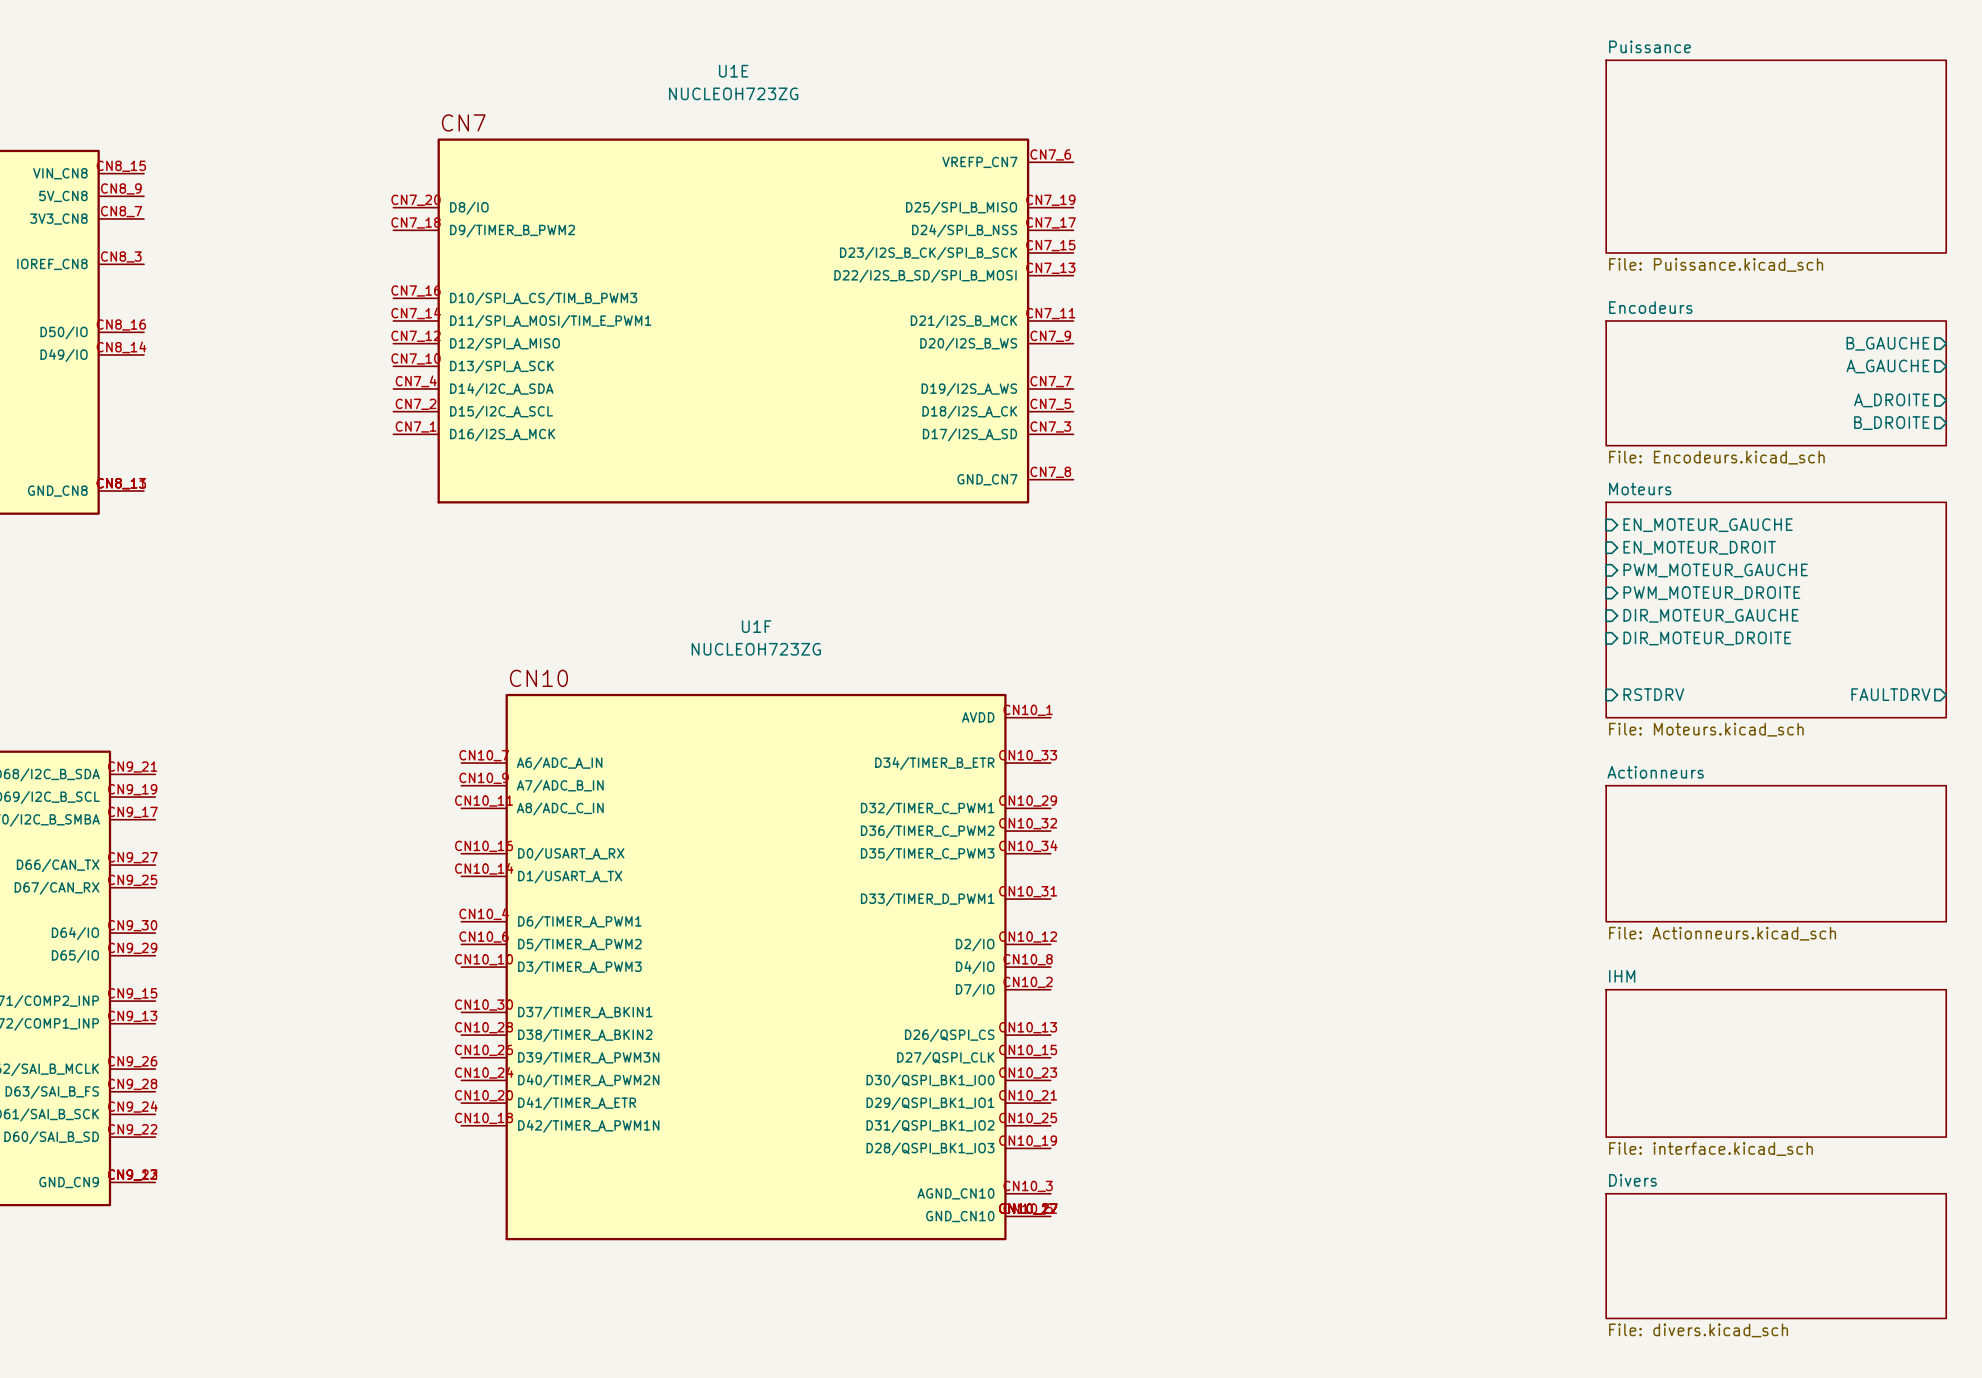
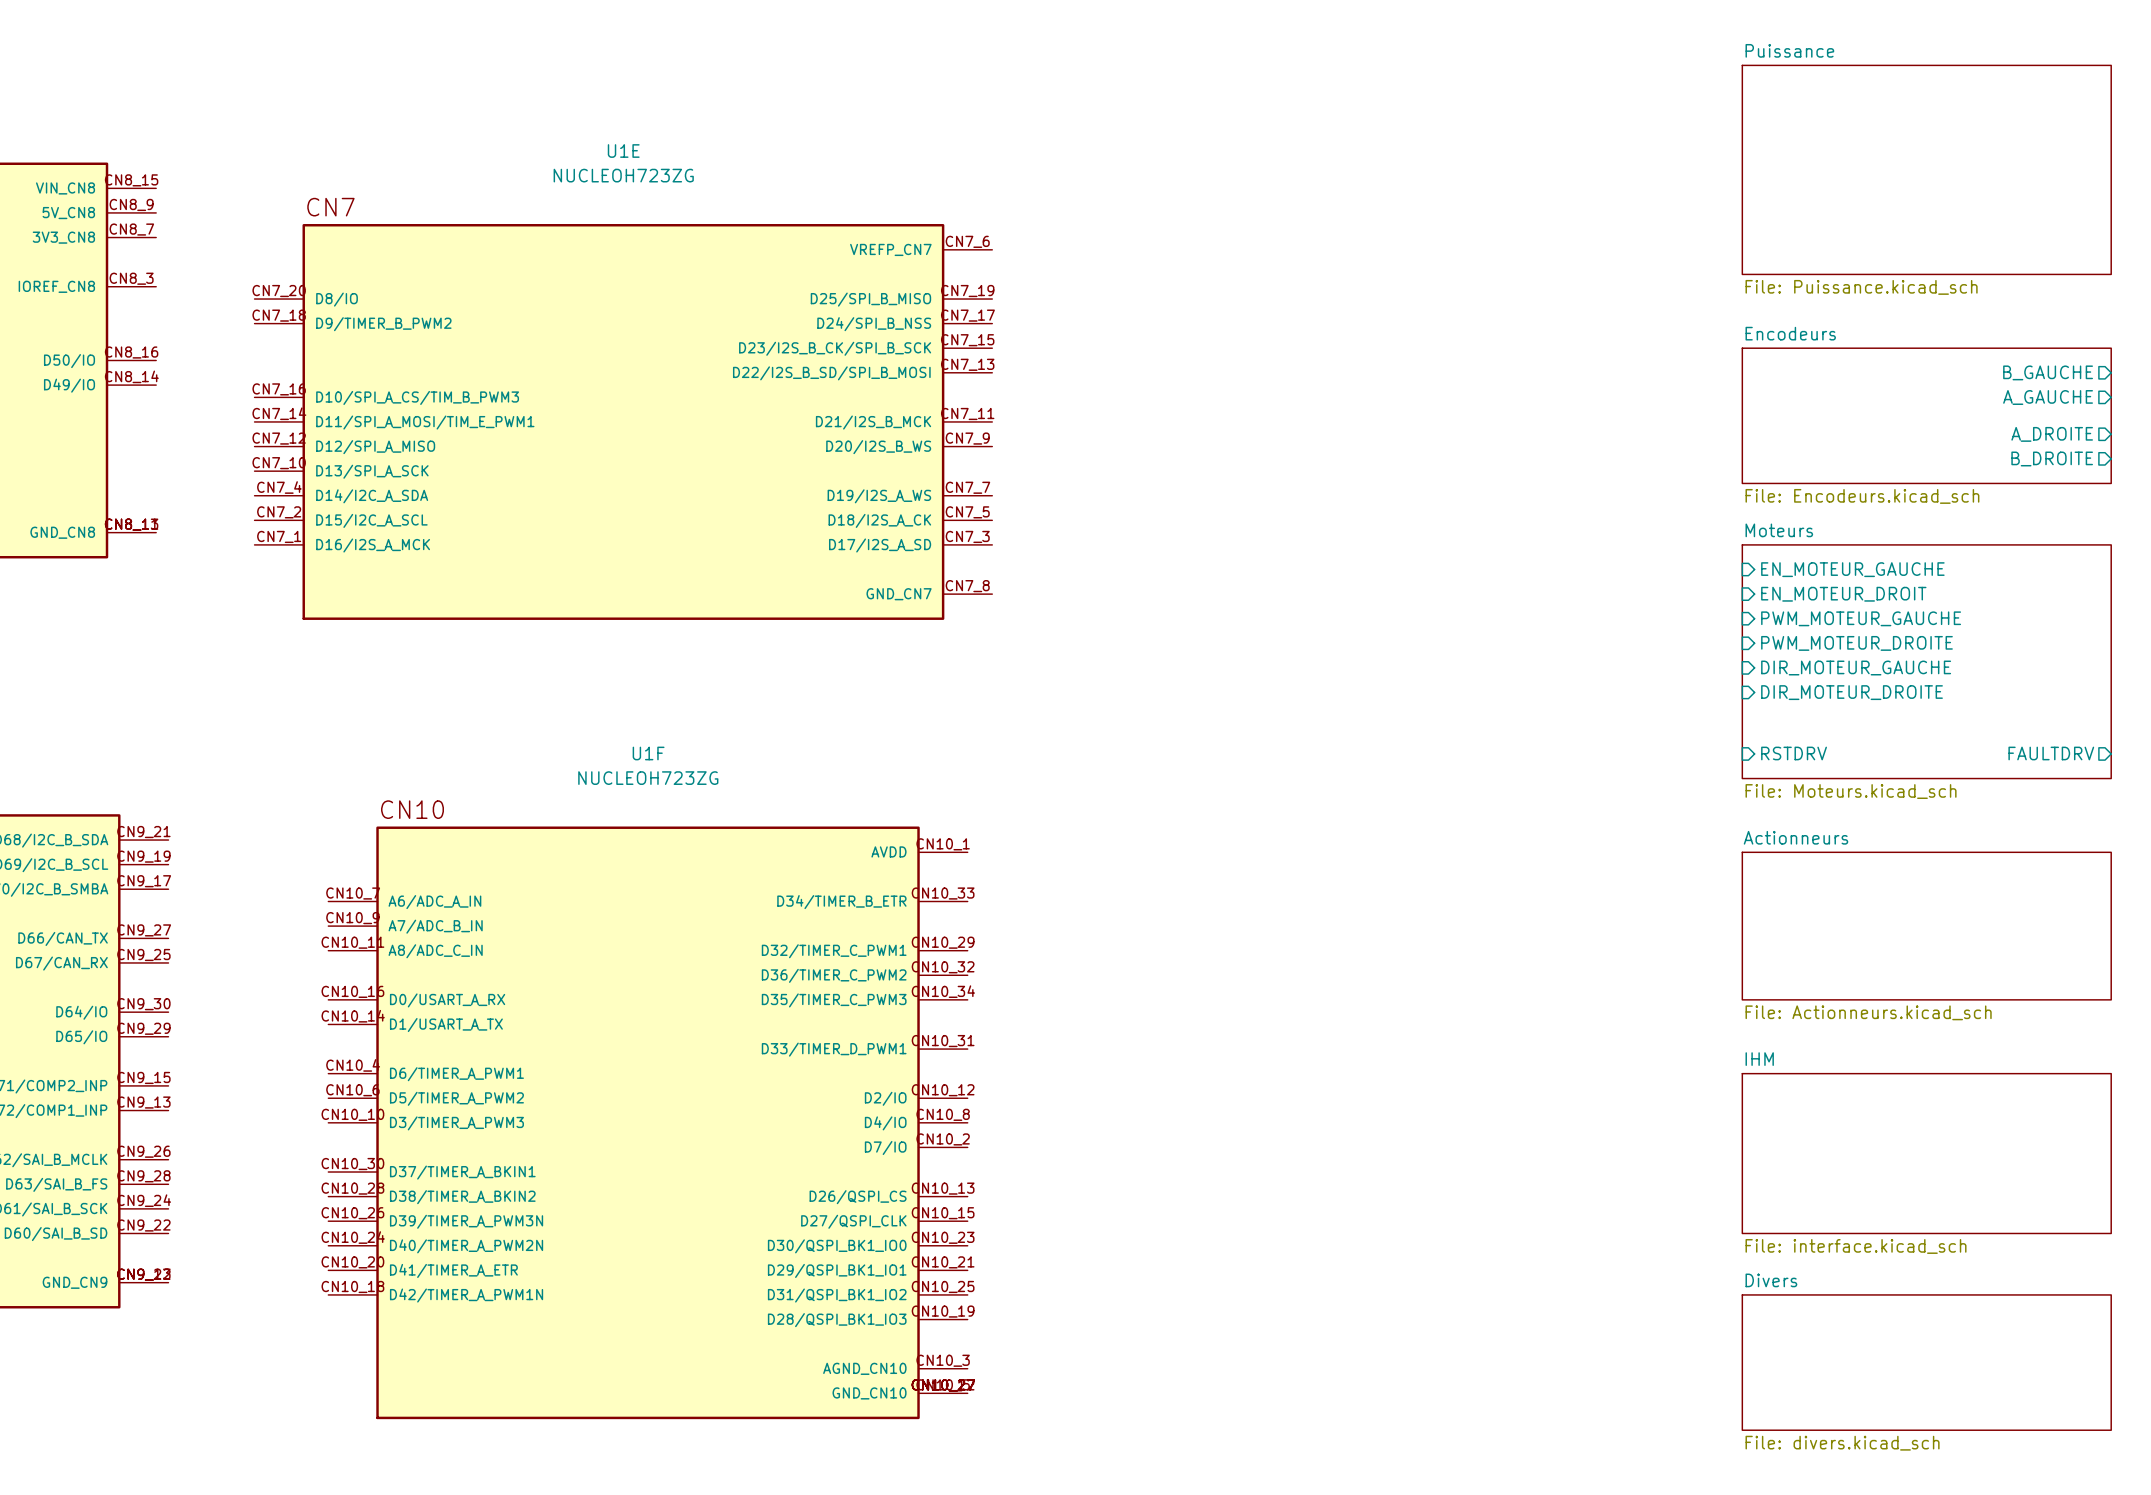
U1E position: (733, 320) -> (623, 421)
U1F position: (756, 967) -> (648, 1122)

